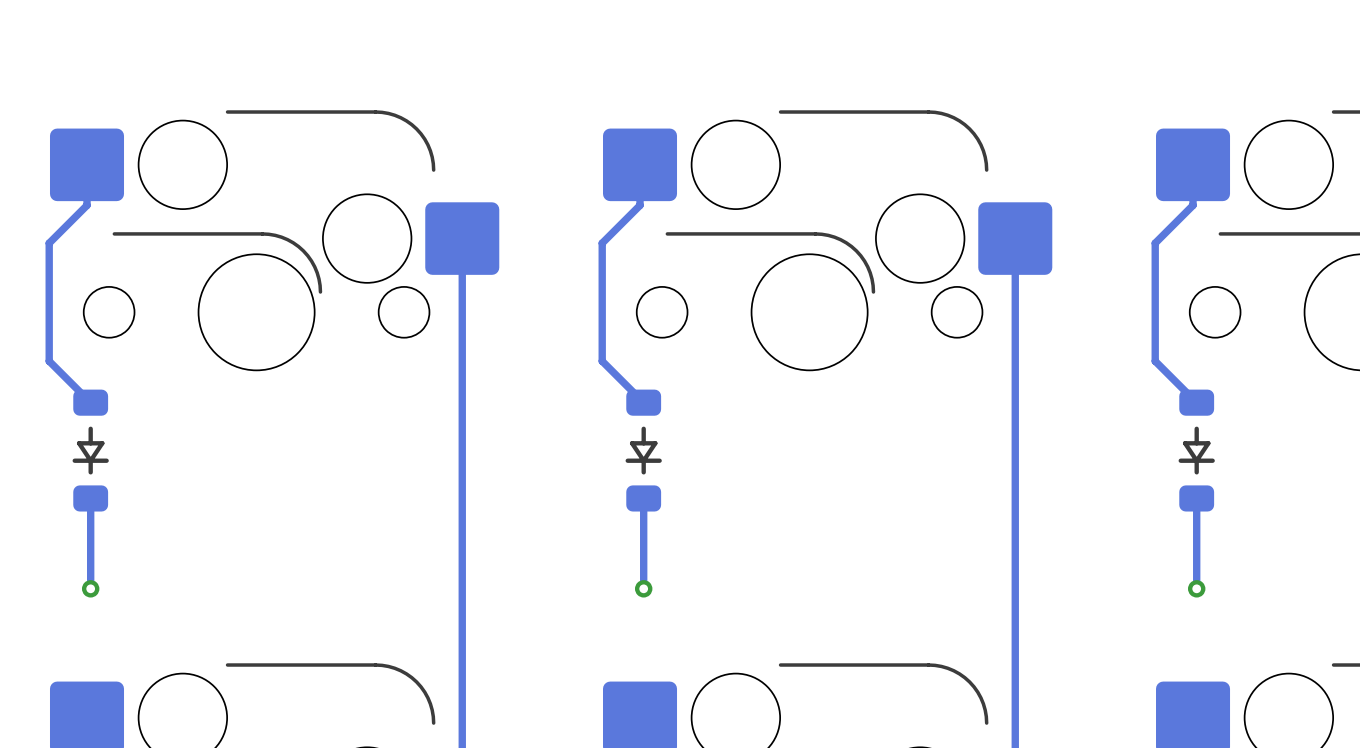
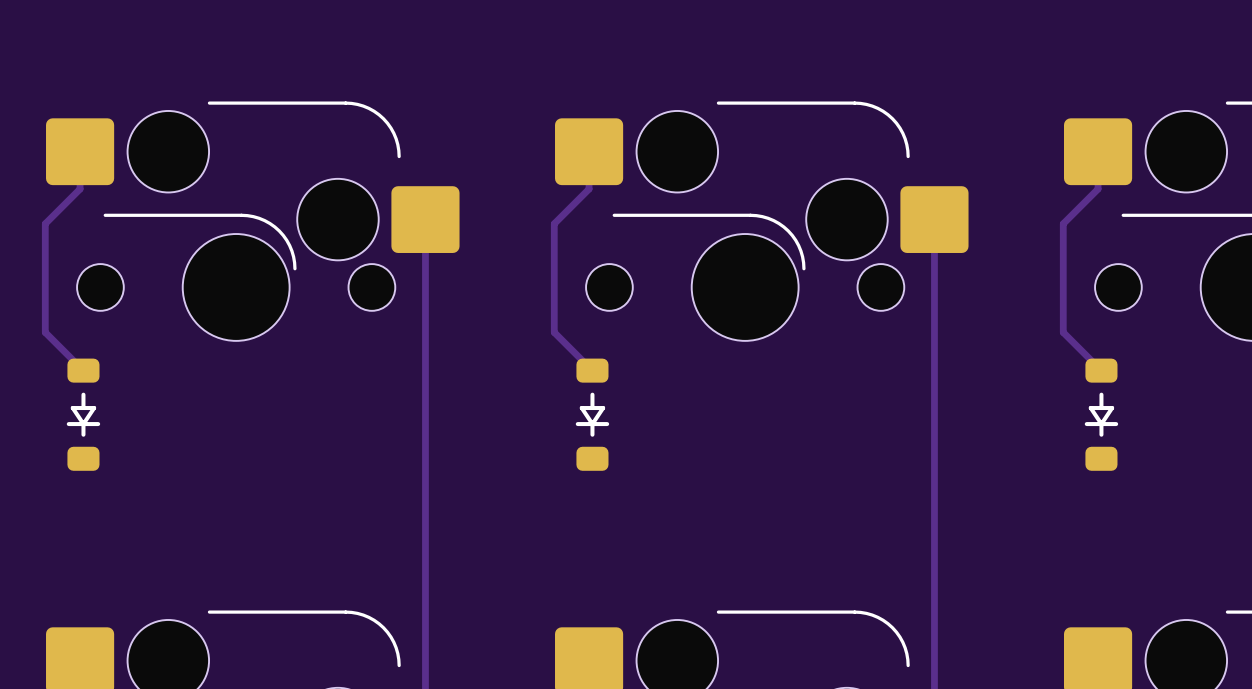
track: (90, 498) (90, 588) -> none
track: (643, 498) (643, 588) -> none
track: (1196, 498) (1196, 588) -> none
via: (90, 588) -> none
via: (643, 588) -> none
via: (1196, 588) -> none

